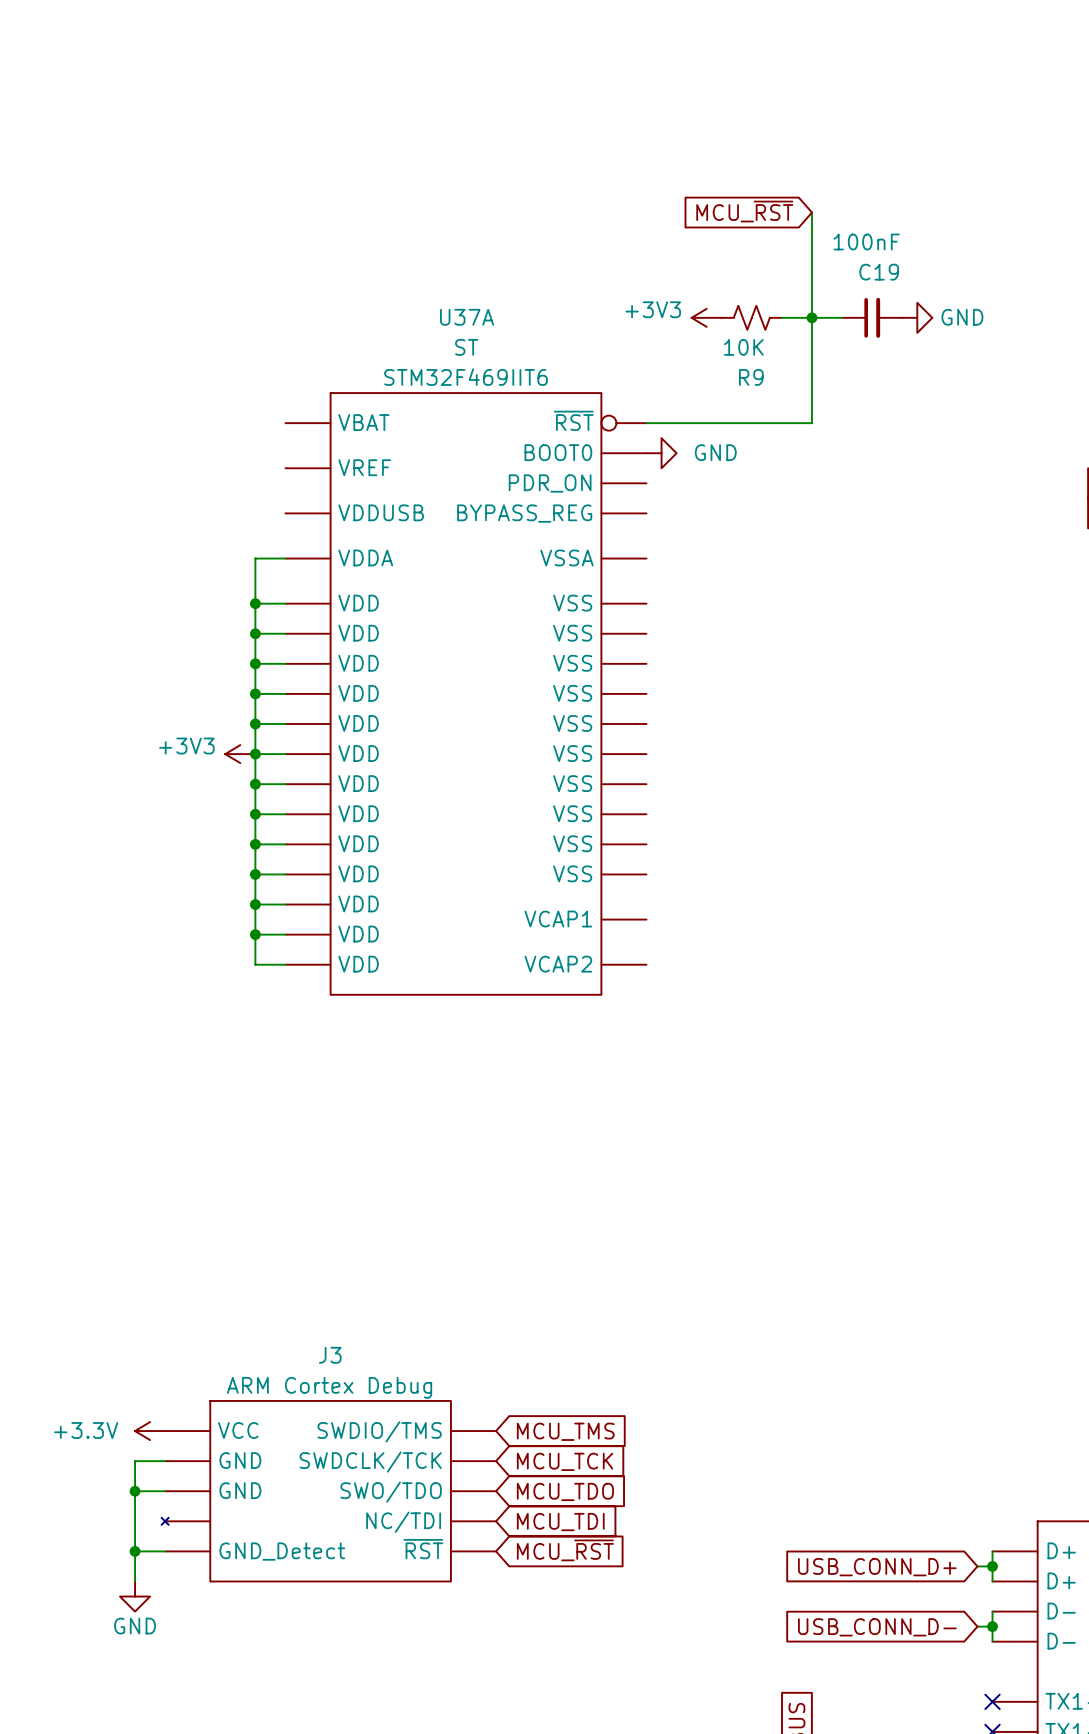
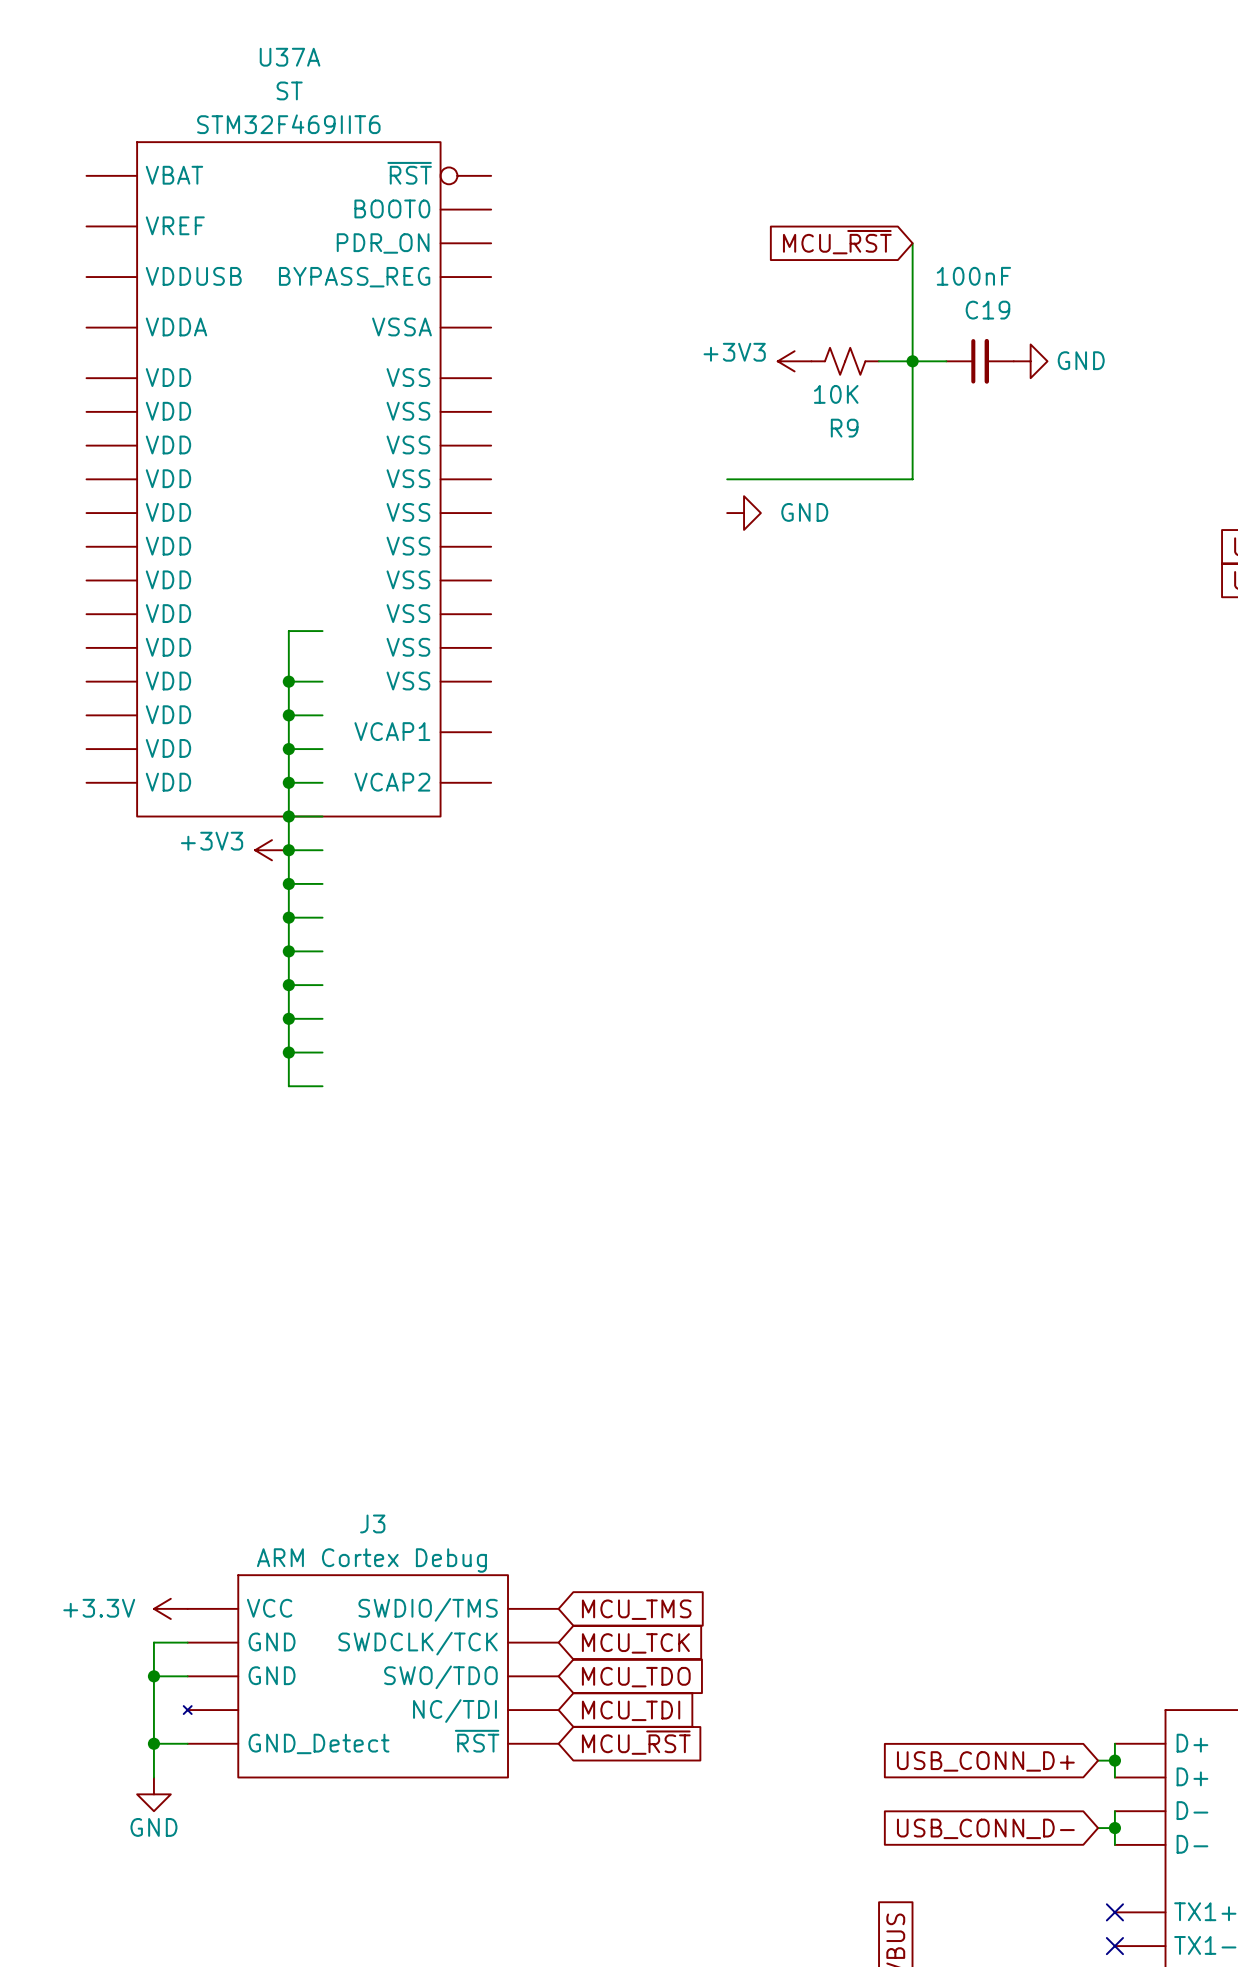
U37A position: (465, 693) -> (288, 479)

